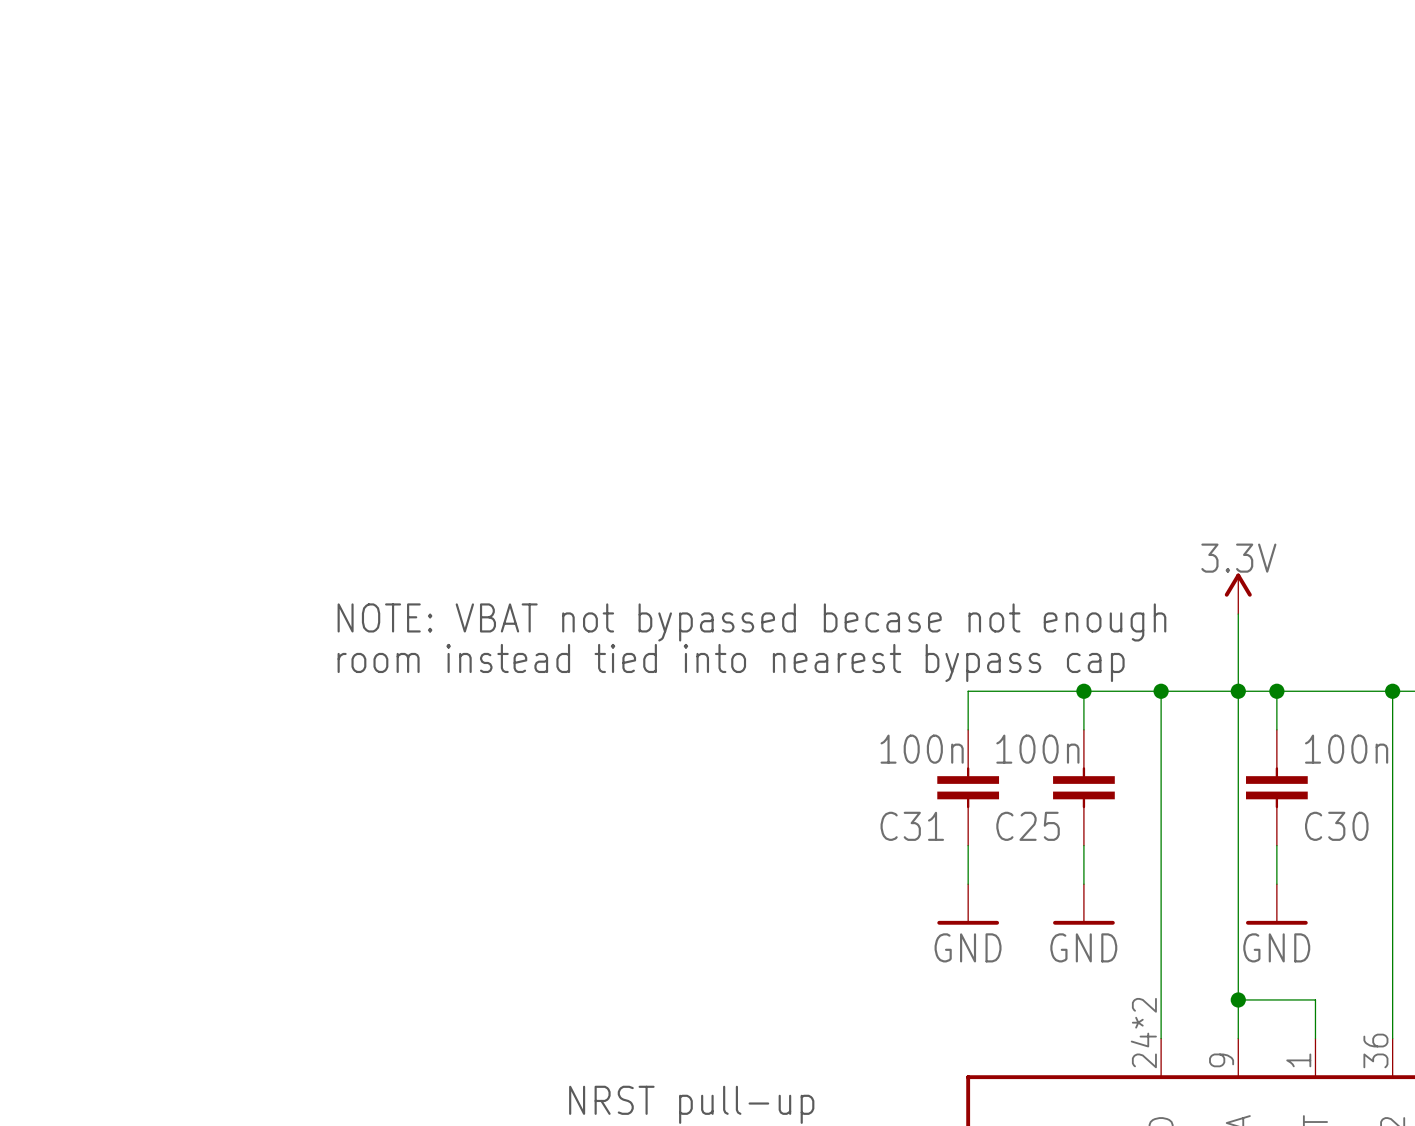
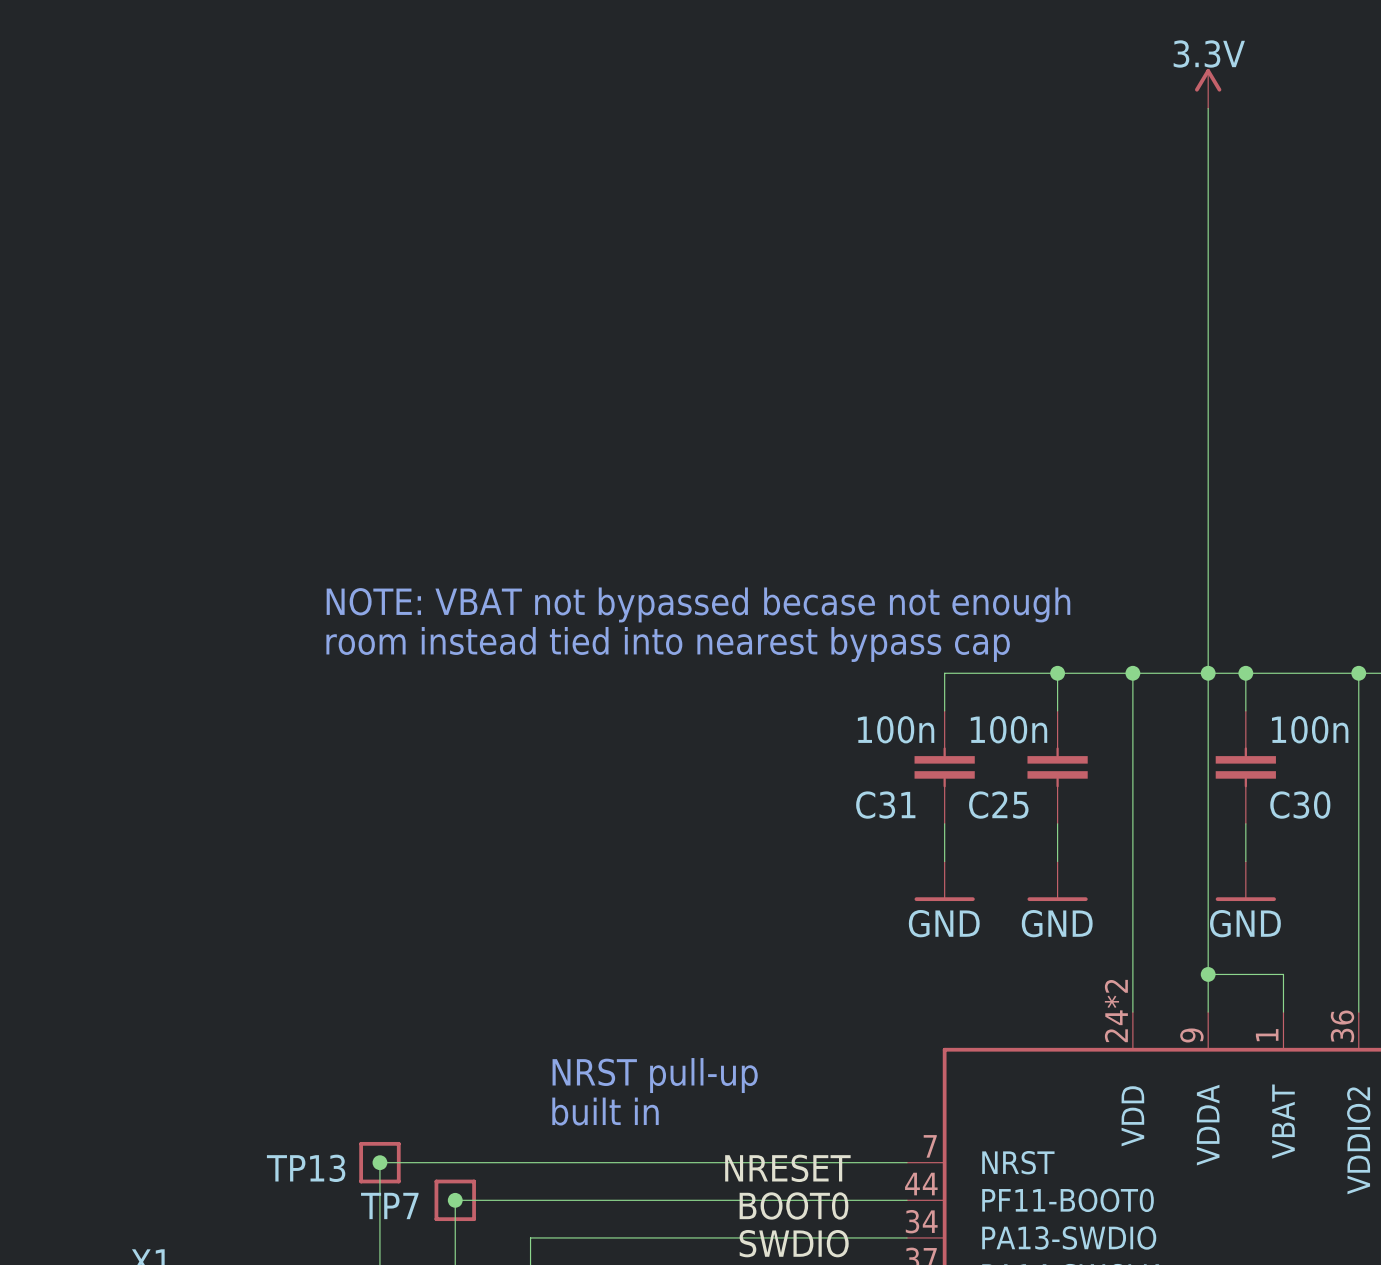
power symbol: none -> 3.3V (1208, 88)
wire: none -> (1208, 108) (1208, 597)
power symbol: 3.3V (1238, 593) -> none

